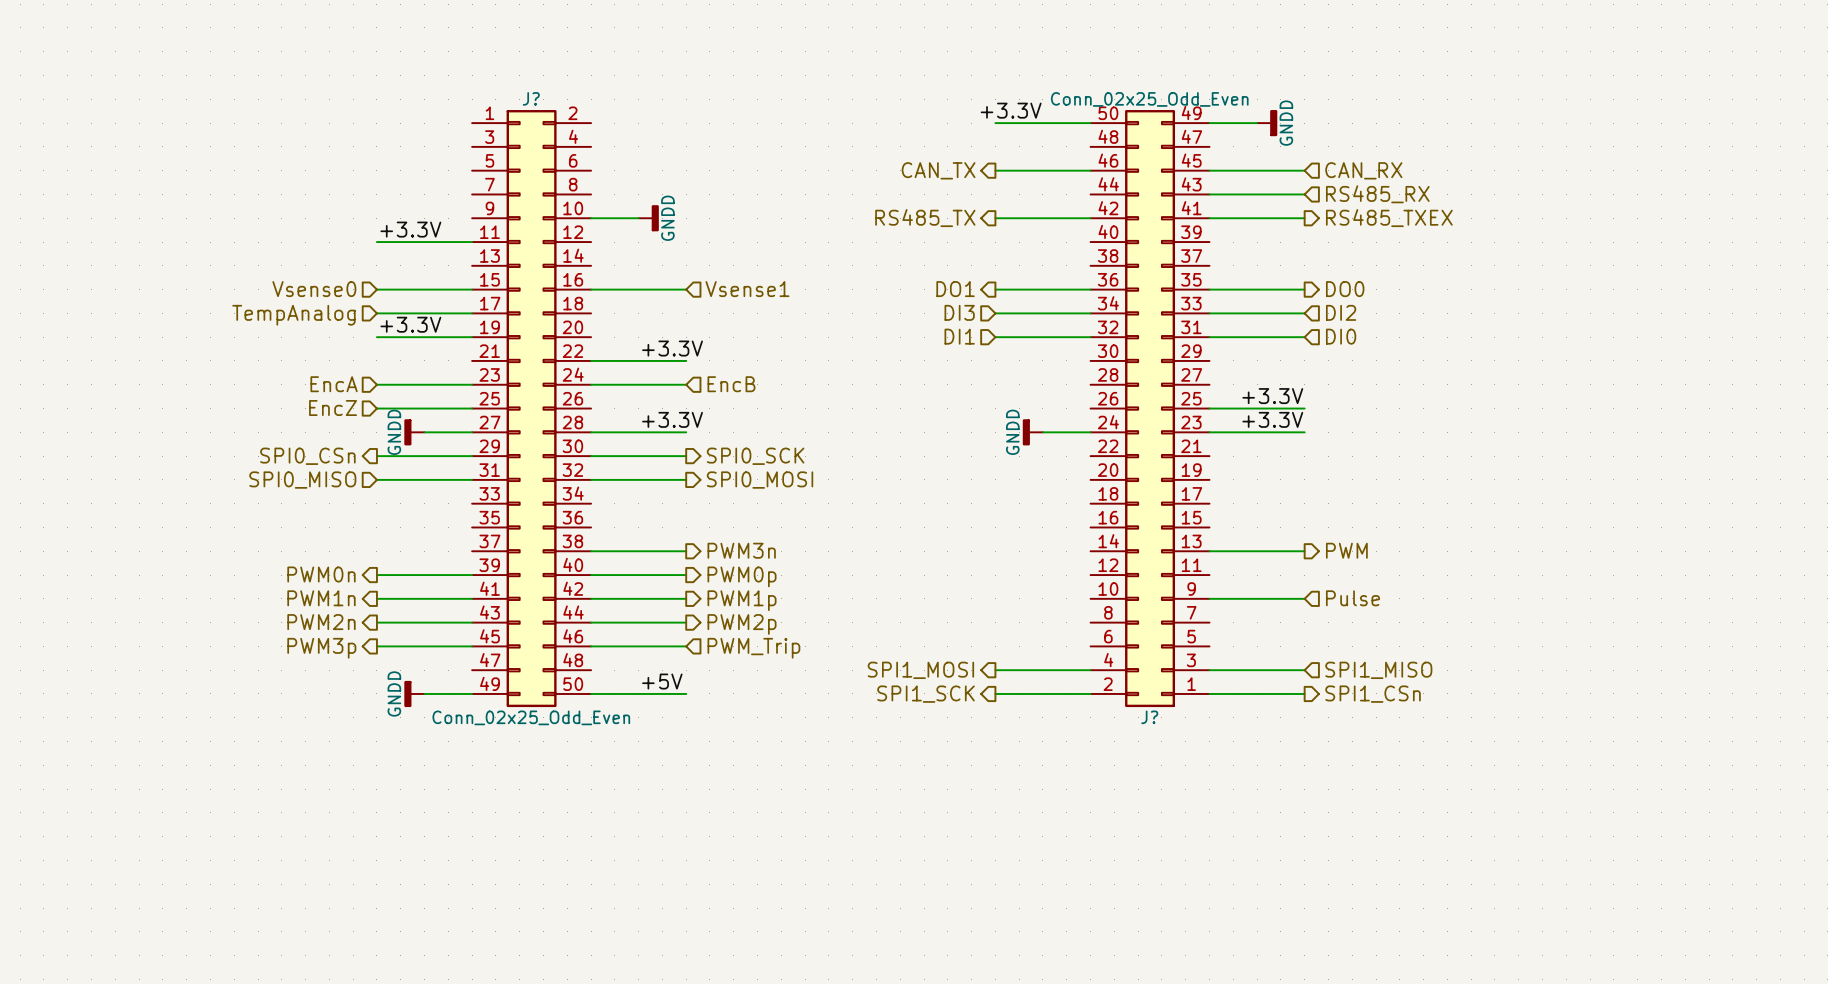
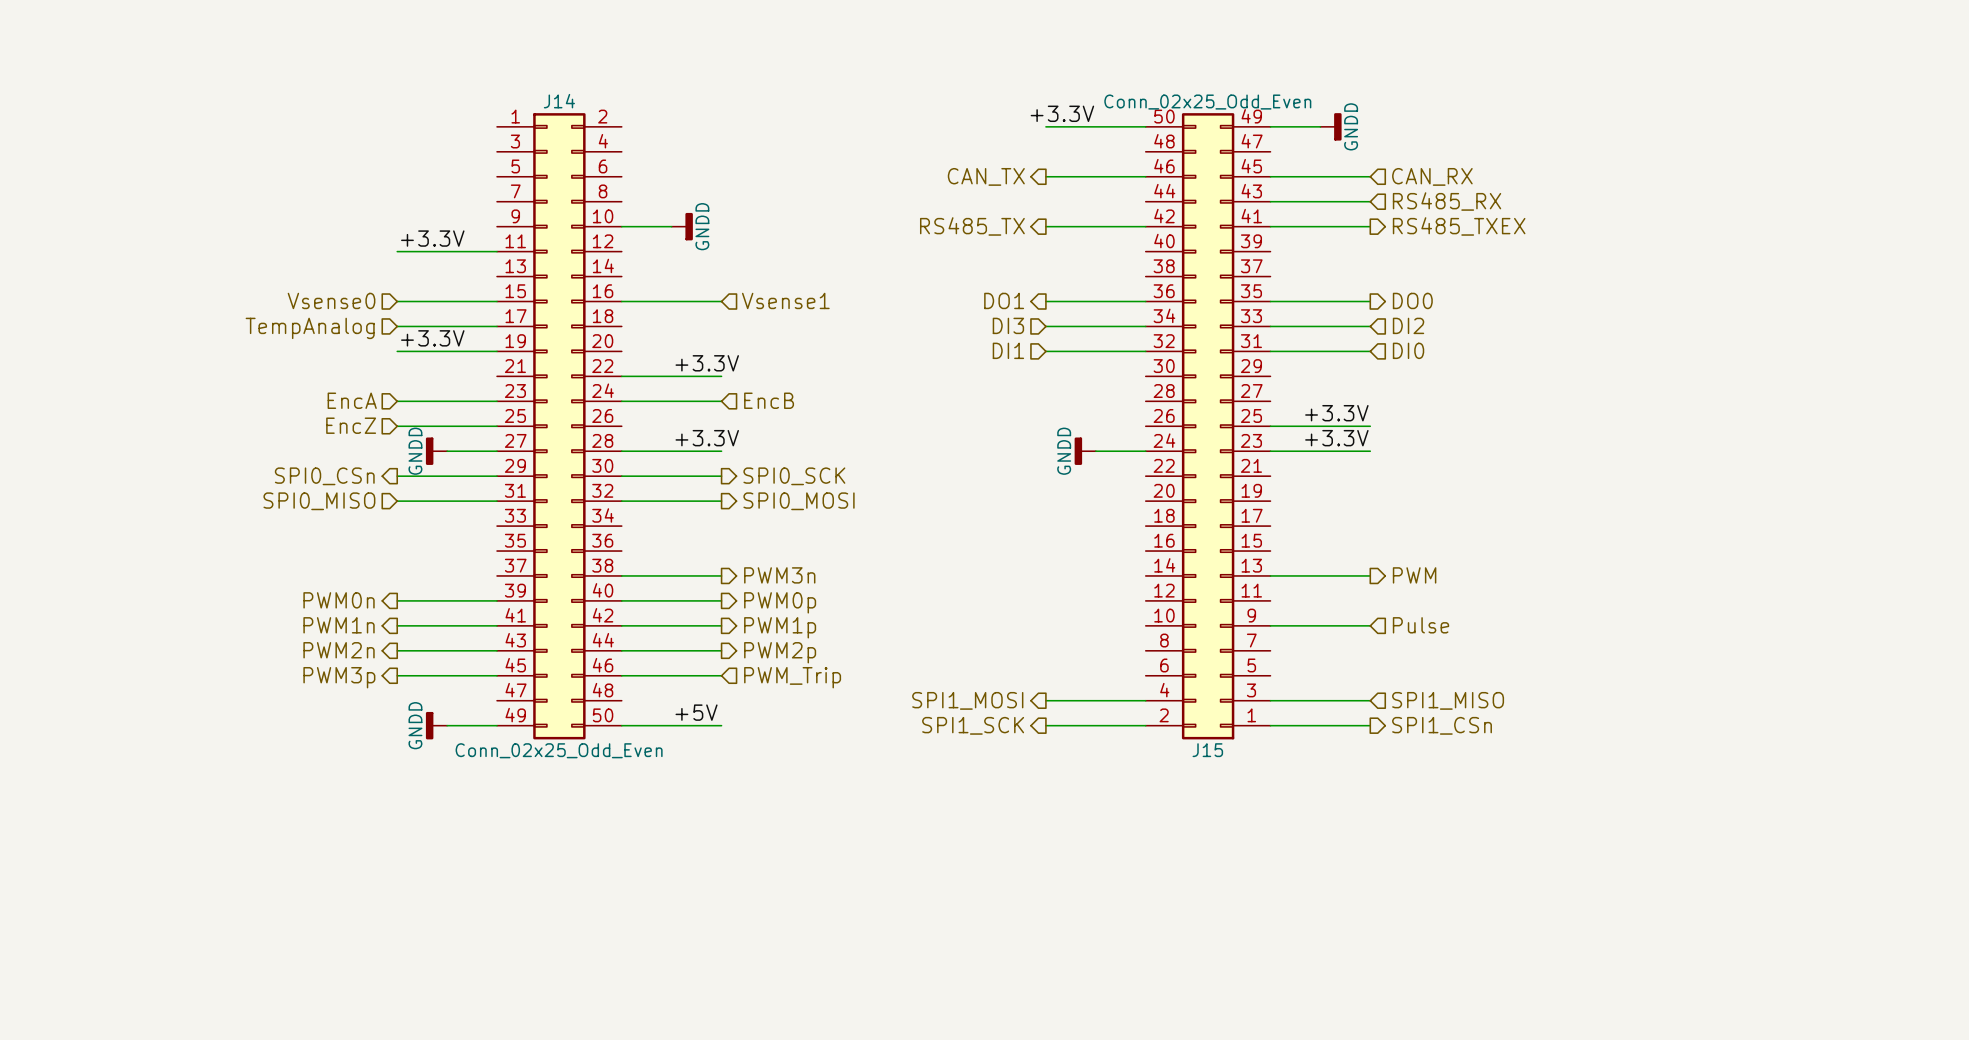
J? name: J? (531, 98) -> J14 (559, 101)
J? name: J? (1149, 717) -> J15 (1207, 750)

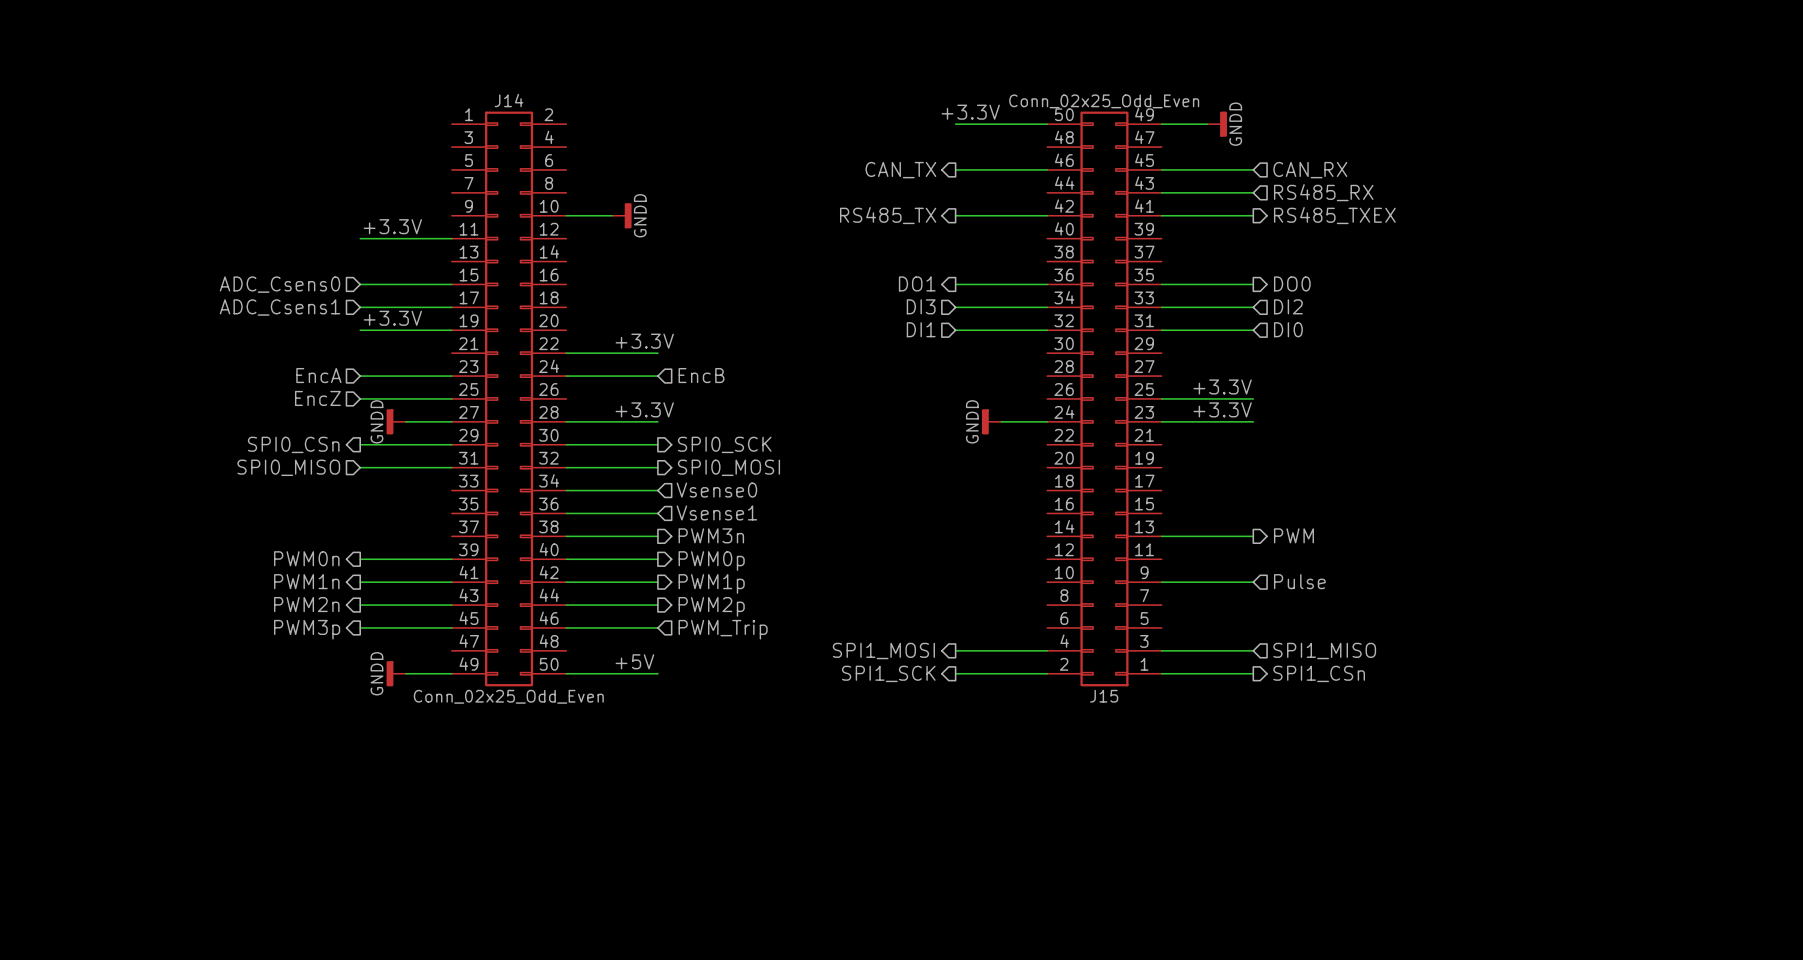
hierarchical label: Vsense0 (331, 300) -> ADC_Csens0 (279, 284)
hierarchical label: Vsense1 (785, 300) -> none
wire: (621, 301) (721, 301) -> (566, 490) (657, 490)
hierarchical label: TempAnalog (310, 328) -> ADC_Csens1 (279, 307)
hierarchical label: none -> Vsense0 (716, 490)
hierarchical label: none -> Vsense1 (716, 512)
wire: none -> (566, 513) (657, 513)

